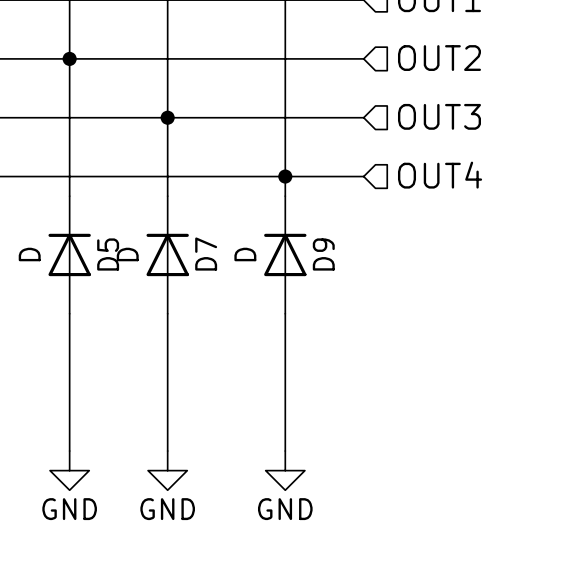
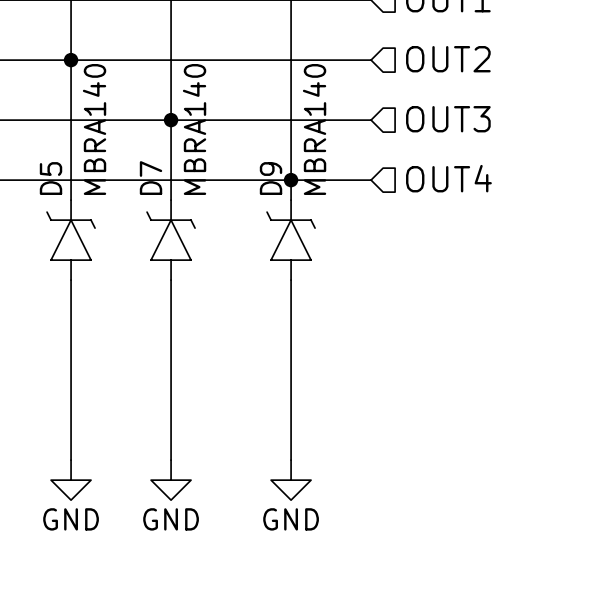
D5 symbol: [48, 196, 91, 314] -> [47, 200, 96, 281]
D7 symbol: [146, 196, 189, 314] -> [147, 200, 196, 281]
D9 symbol: [264, 196, 307, 314] -> [267, 200, 316, 281]
D5 value: D (29, 254) -> MBRA140 (94, 129)
D5 name position: D5 (108, 254) -> D5 (51, 178)
D7 value: D (127, 254) -> MBRA140 (194, 129)
D7 name position: D7 (206, 254) -> D7 (151, 178)
D9 value: D (245, 254) -> MBRA140 (314, 129)
D9 name position: D9 (323, 254) -> D9 (271, 178)

